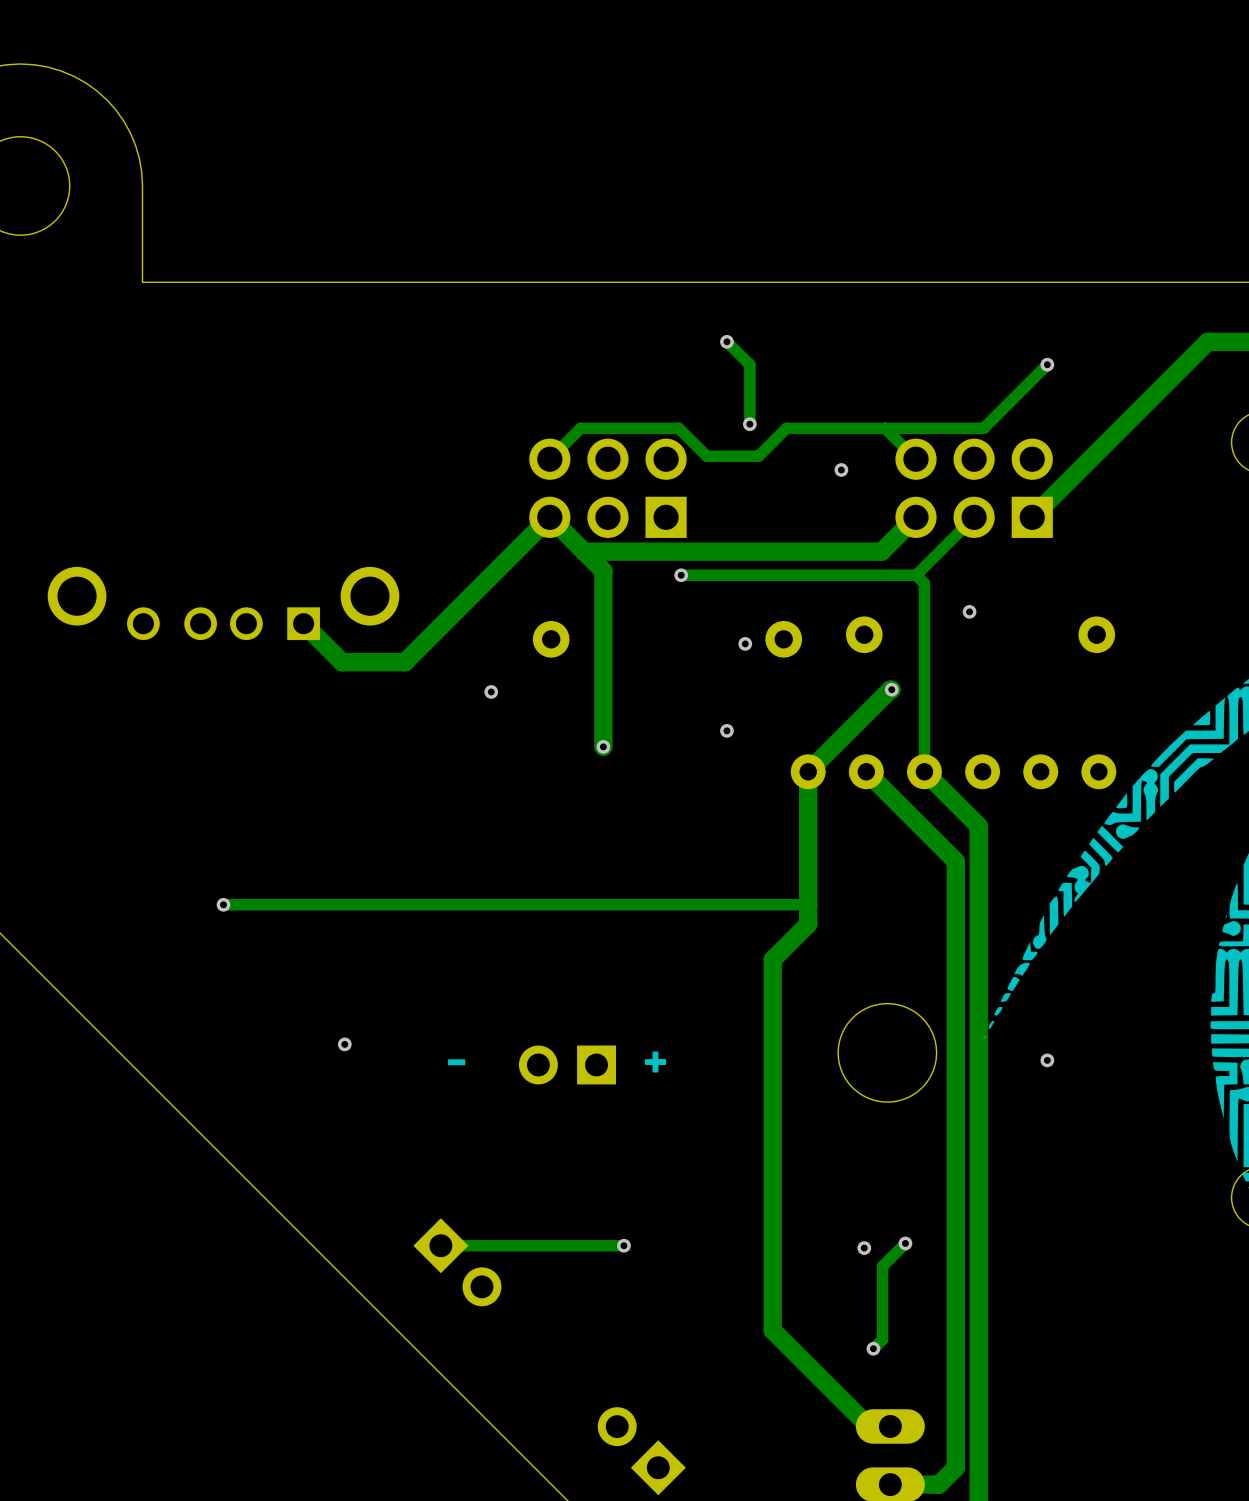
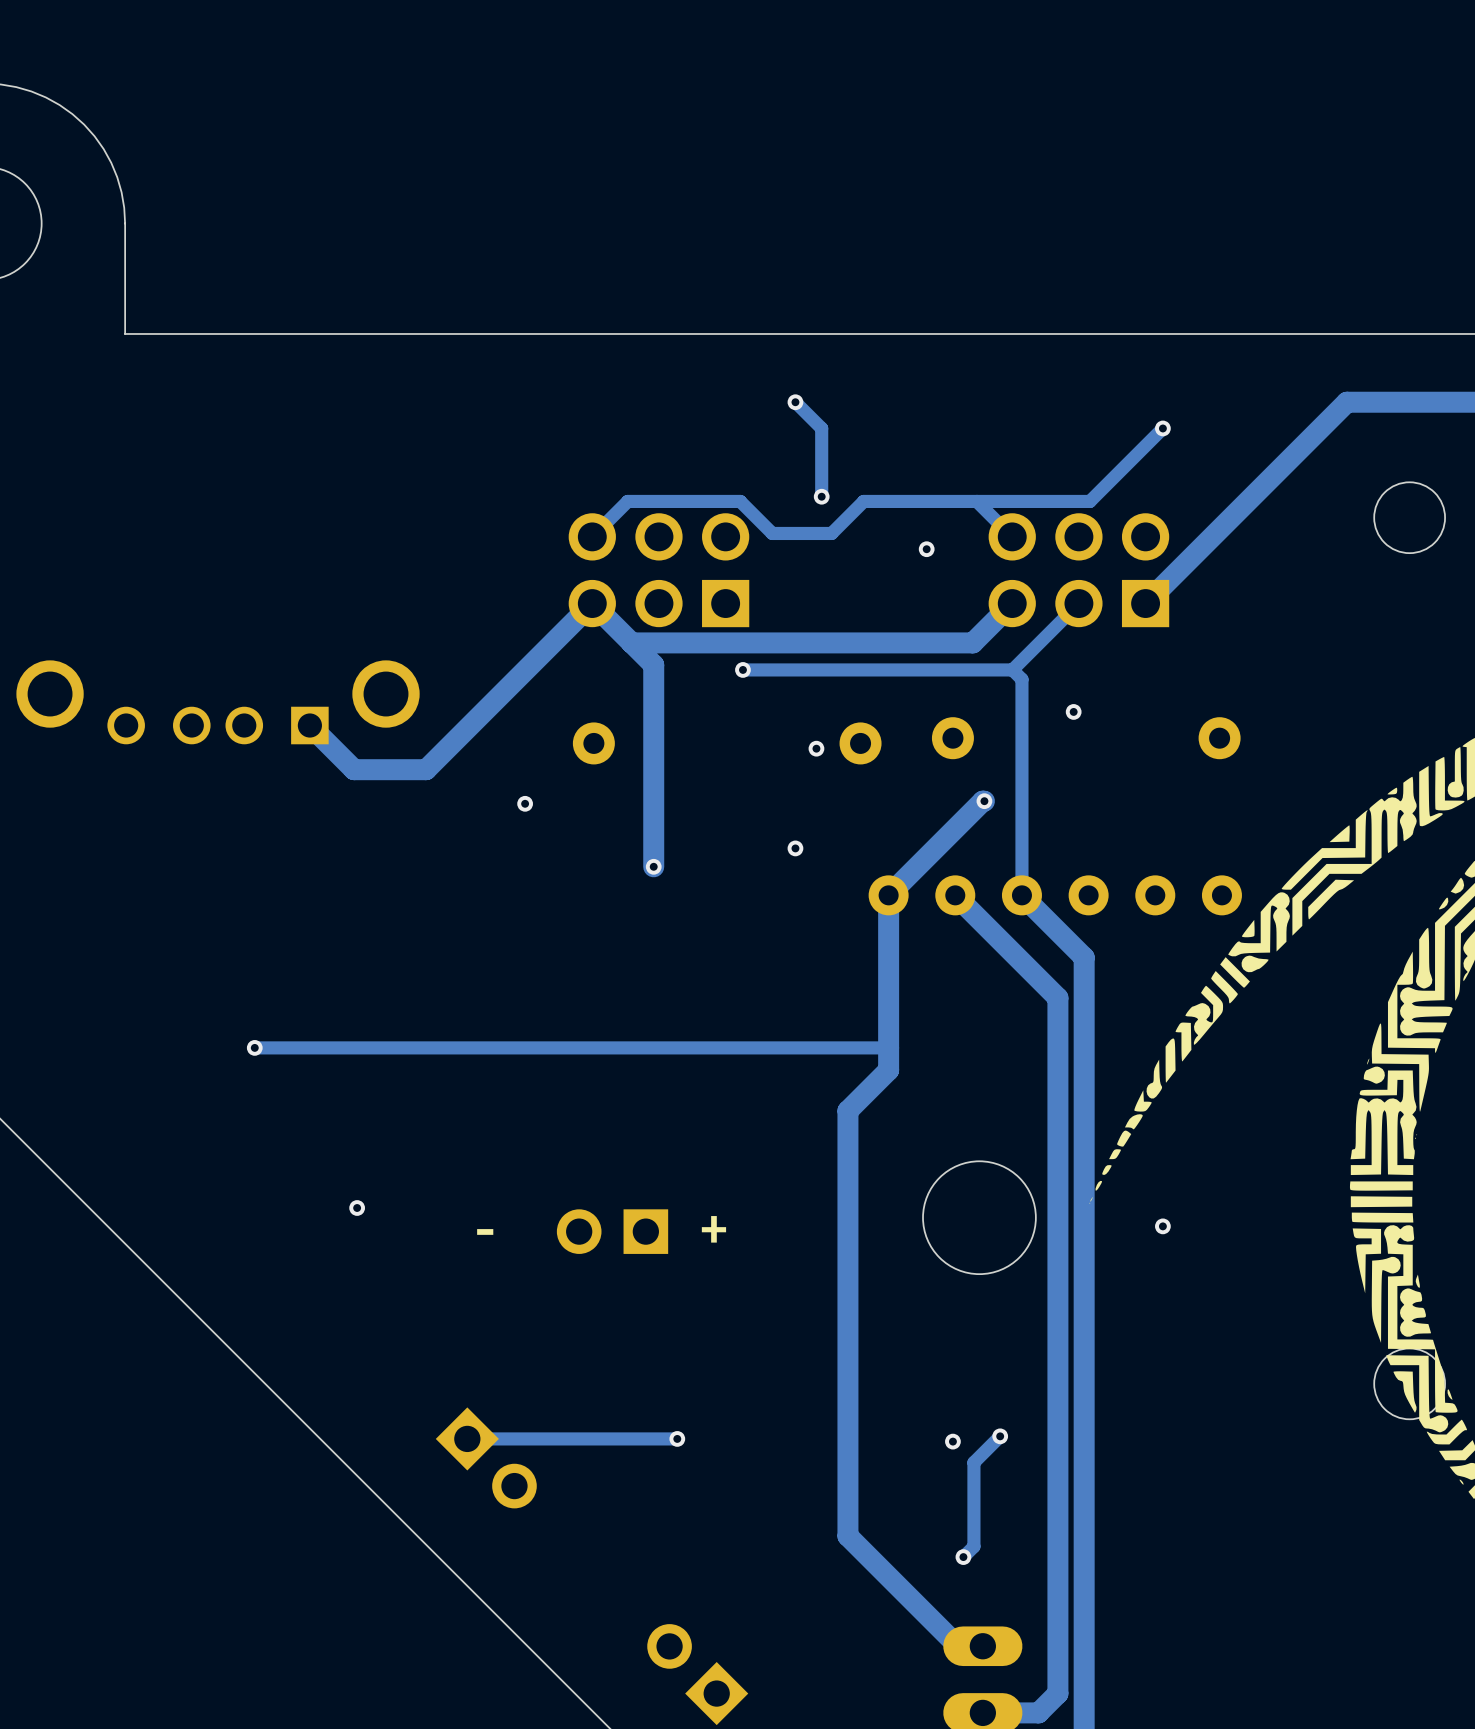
via position: (223, 904) -> (254, 1047)
track: (255, 904) (223, 904) -> none

